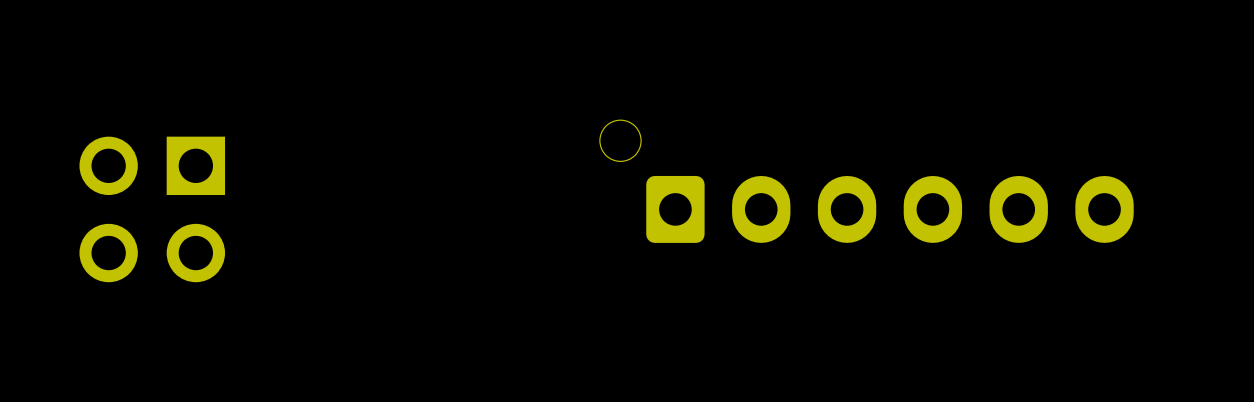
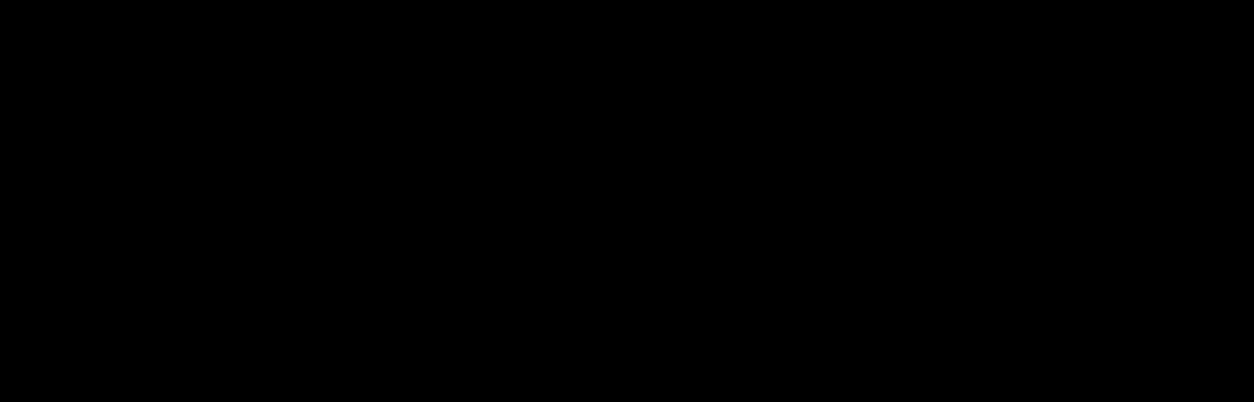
part: (866, 181) -> none
part: (152, 209) -> none

